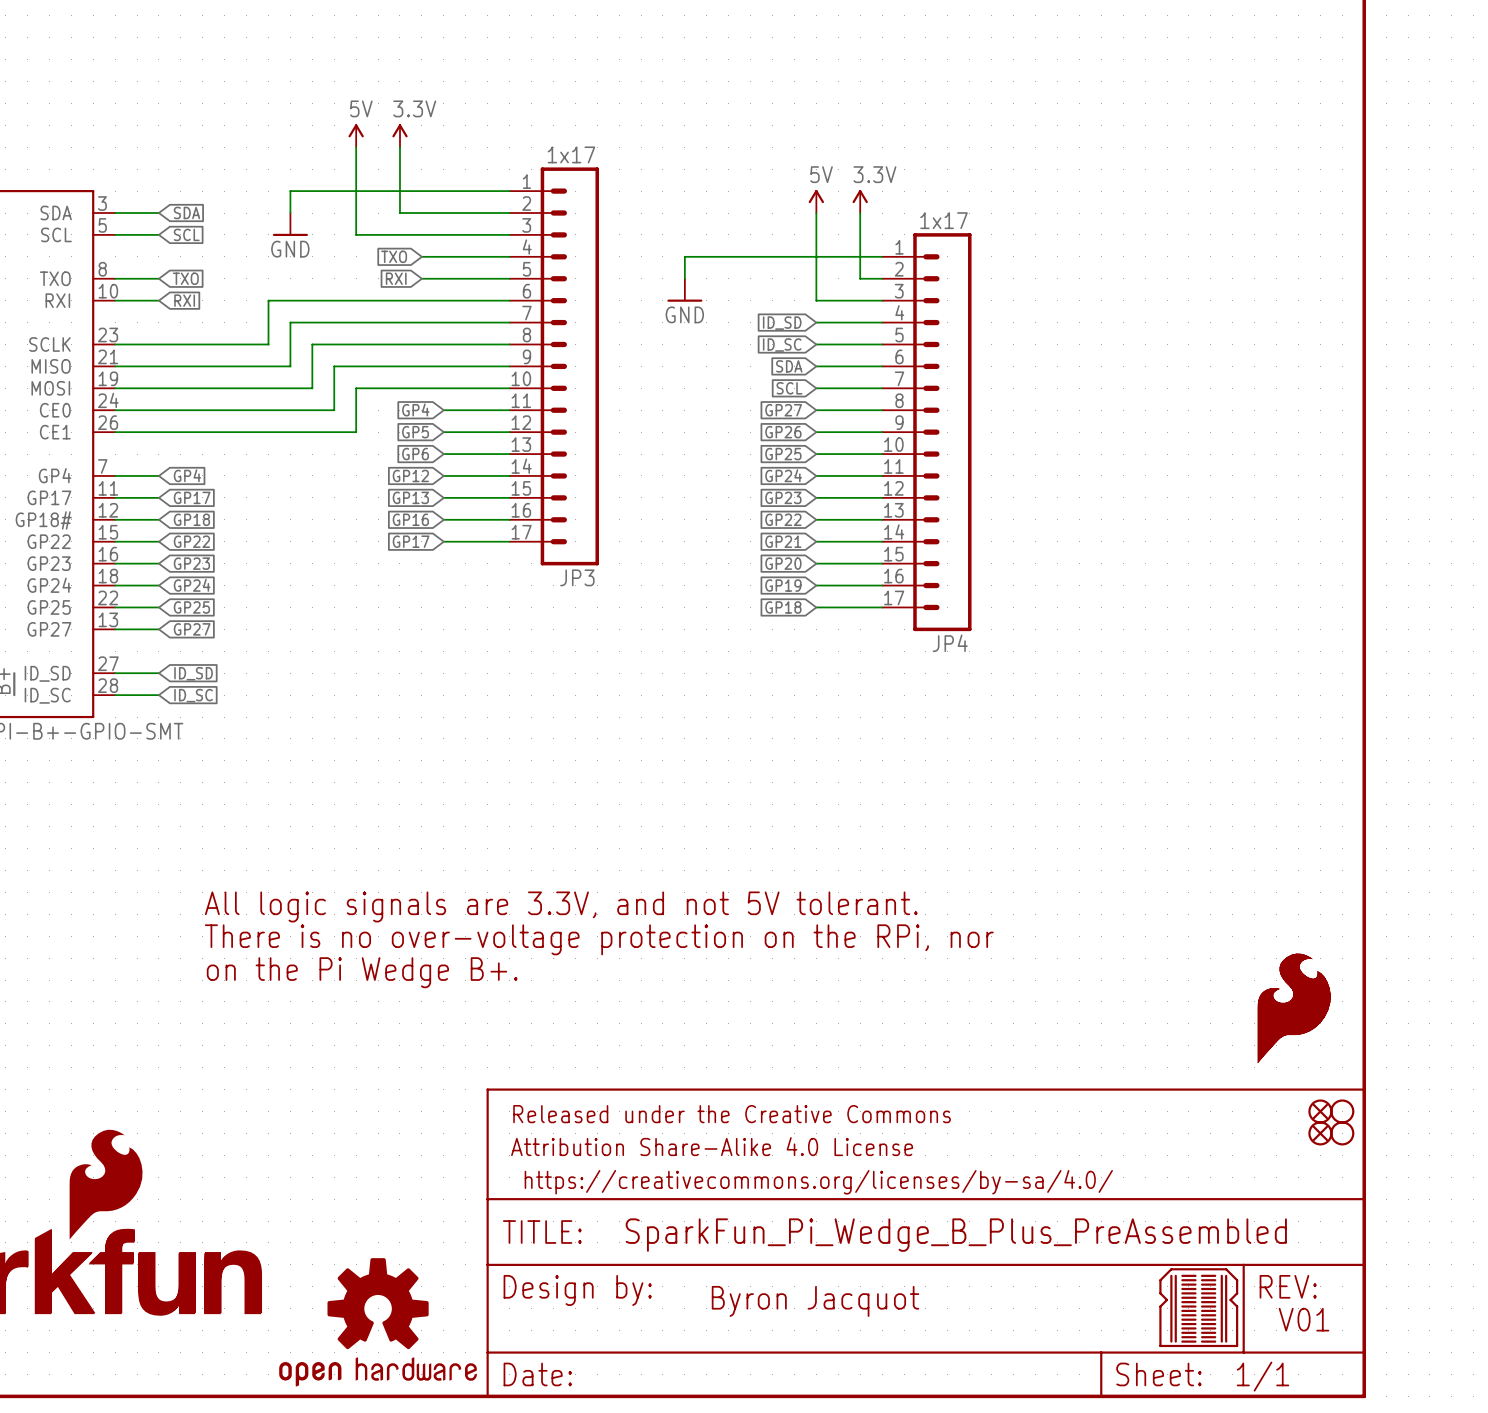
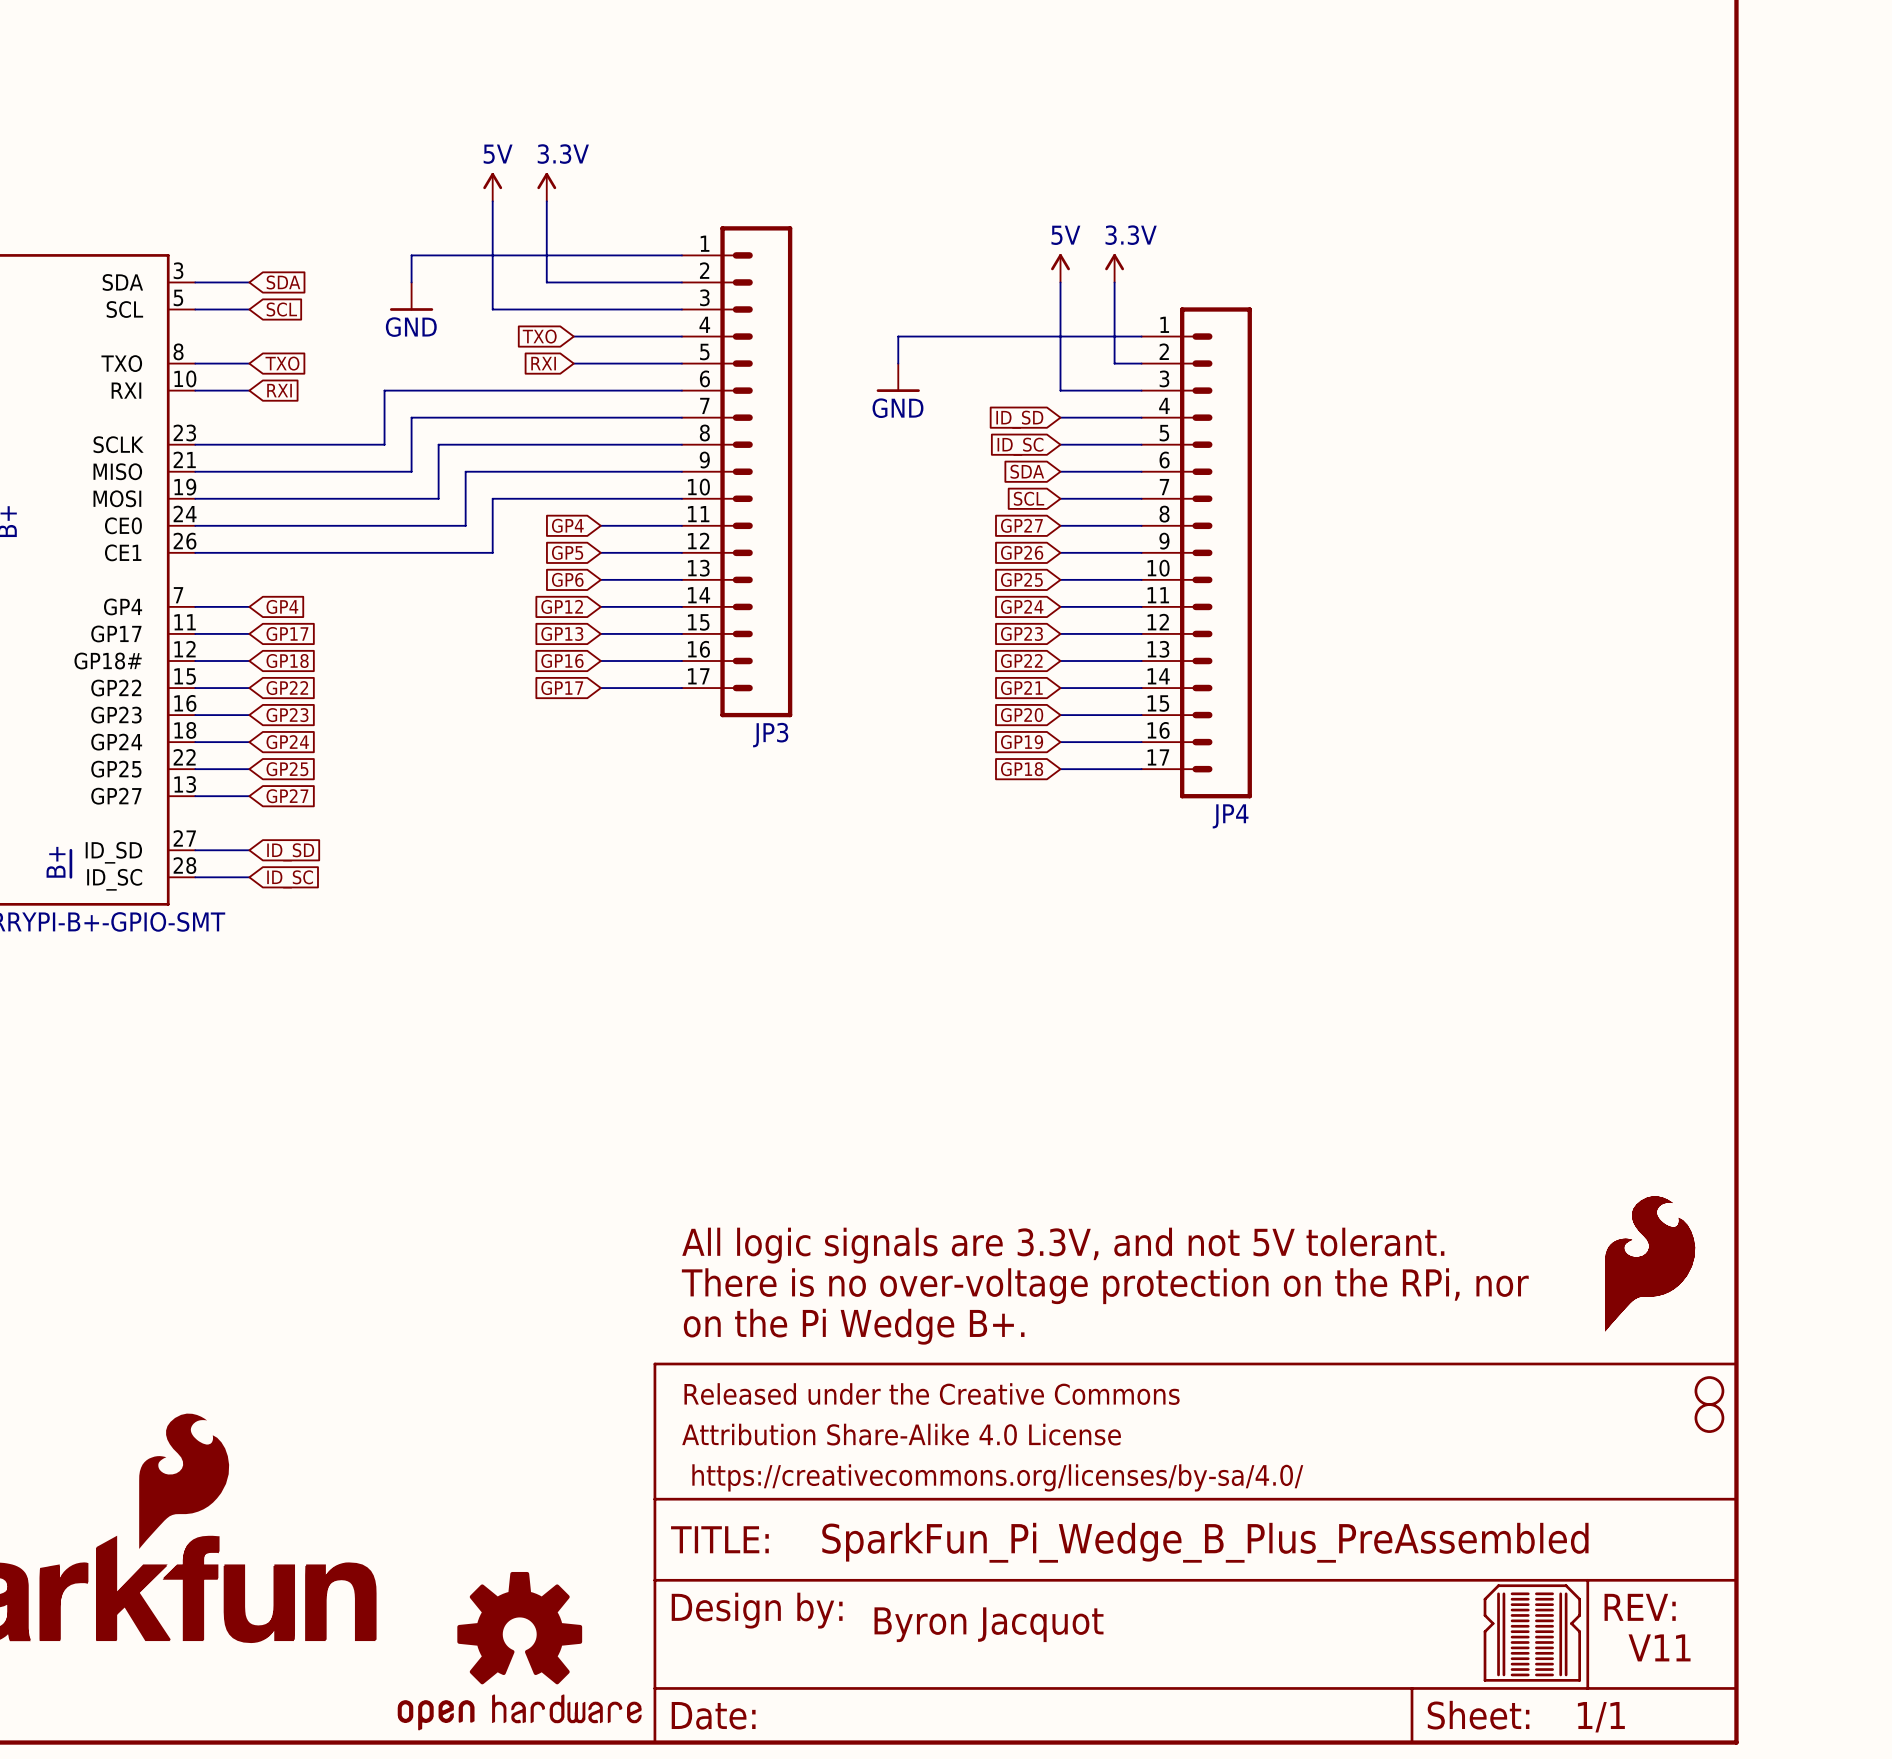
JP3 value: 1x17 (571, 154) -> none
JP4 value: 1x17 (943, 220) -> none
text: All logic signals are 3.3V, and not 5V tolerant. (561, 906) -> none
text: There is no over-voltage protection on the RPi, nor (599, 939) -> none
text: on the Pi Wedge B+. (362, 972) -> none
text: none -> All logic signals are 3.3V, and not 5V tolerant. (1063, 1245)
text: none -> There is no over-voltage protection on the RPi, nor (1105, 1286)
text: none -> on the Pi Wedge B+. (854, 1326)
part: (1320, 1111) -> none
part: (1320, 1133) -> none
text position: Byron Jacquot (815, 1301) -> Byron Jacquot (989, 1624)
text: V01 (1304, 1319) -> V11 (1659, 1647)

